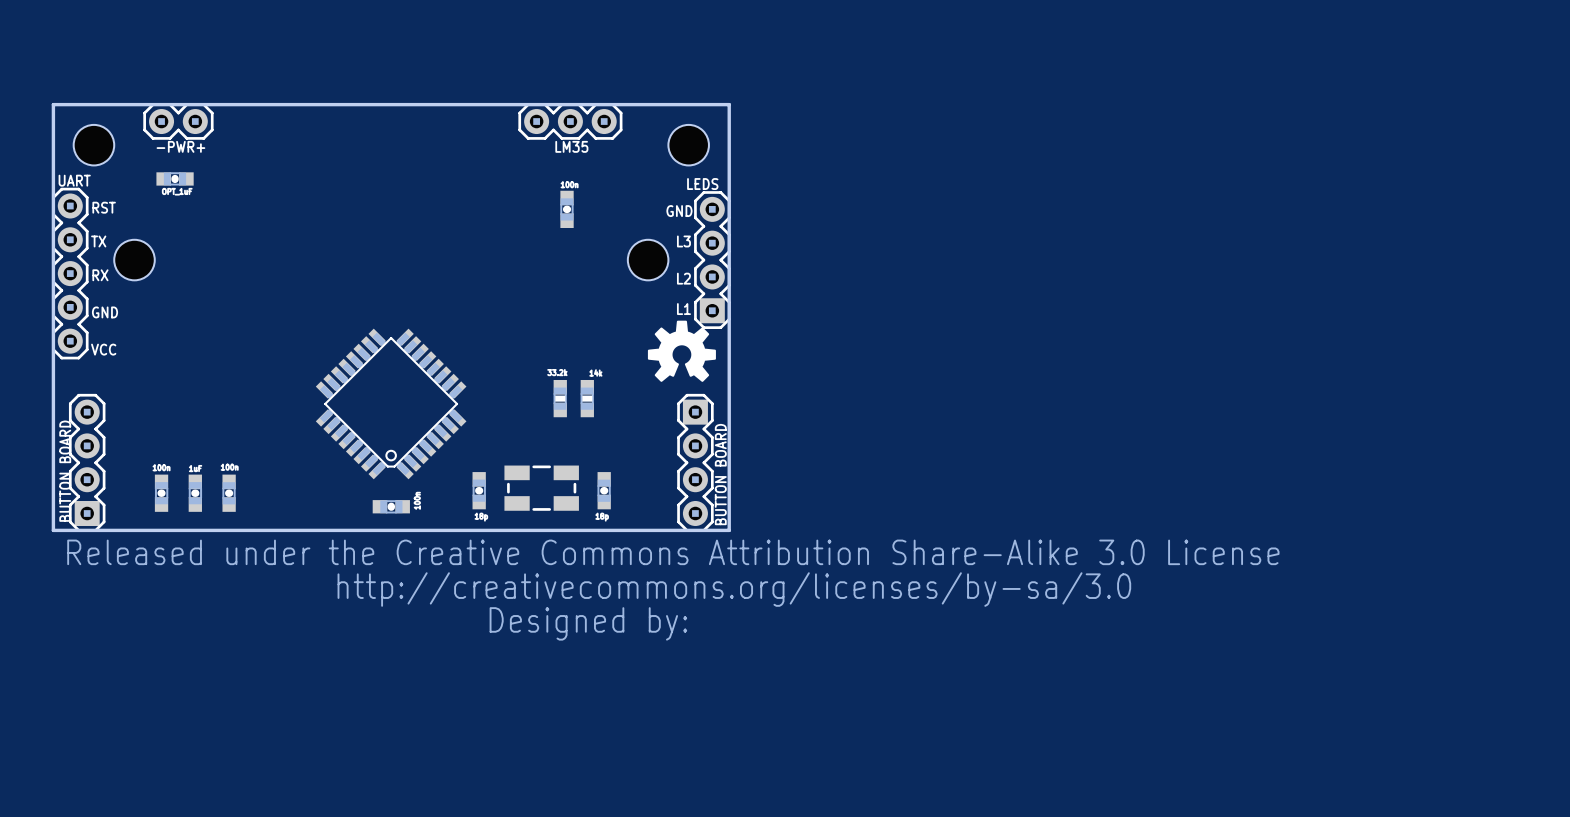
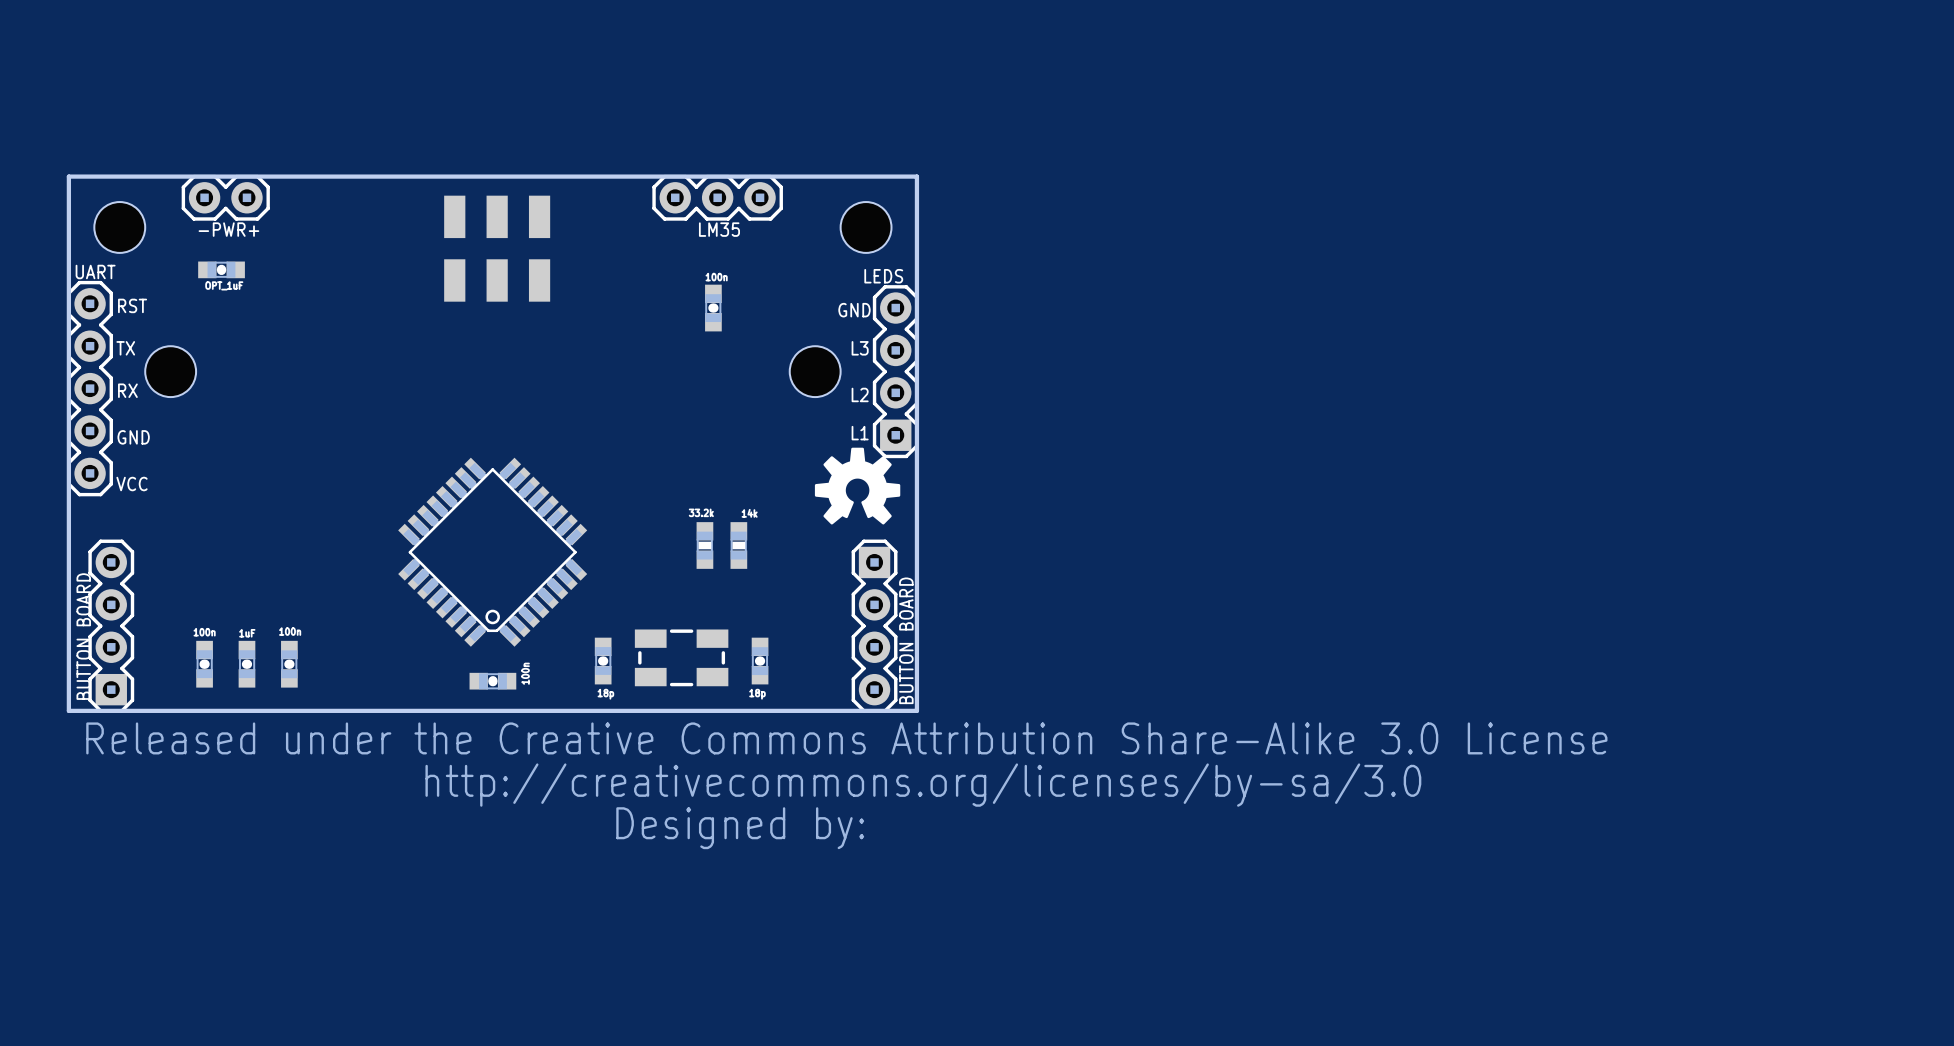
part: none -> (497, 248)

